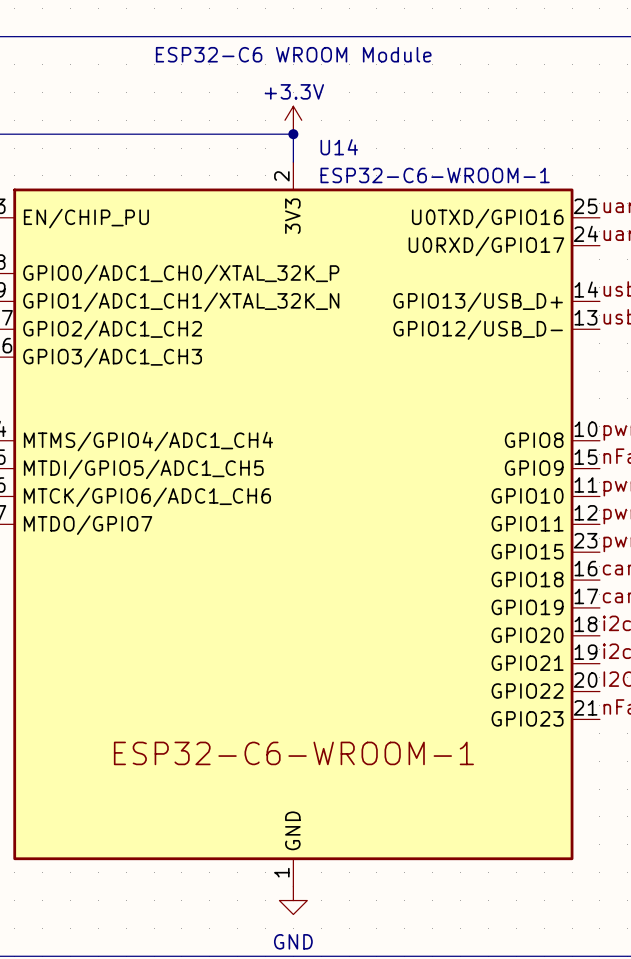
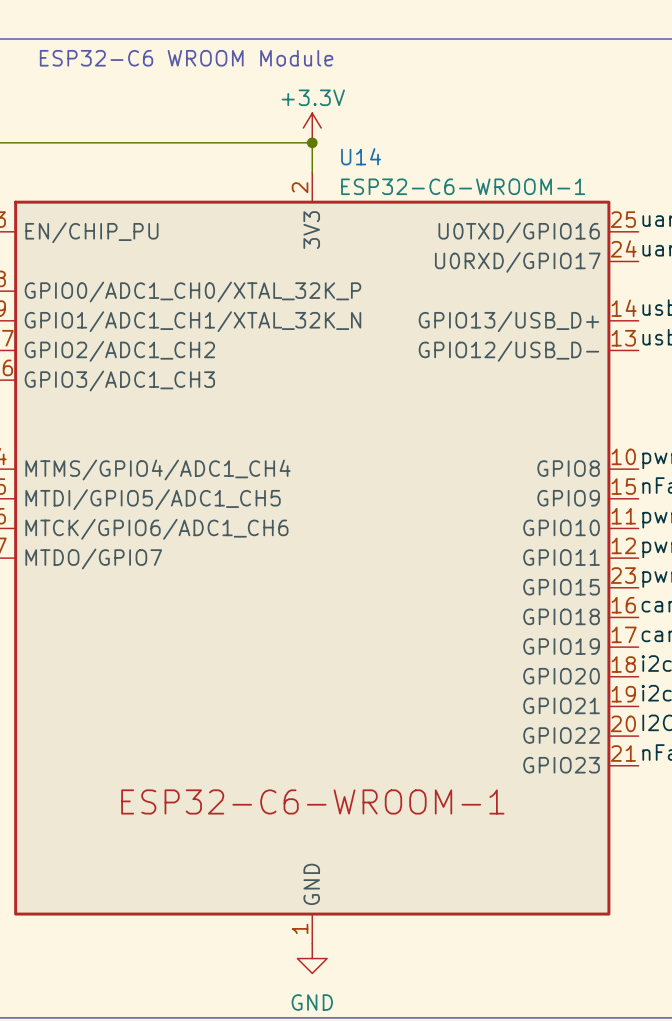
text position: ESP32-C6 WROOM Module (293, 54) -> ESP32-C6 WROOM Module (186, 58)

